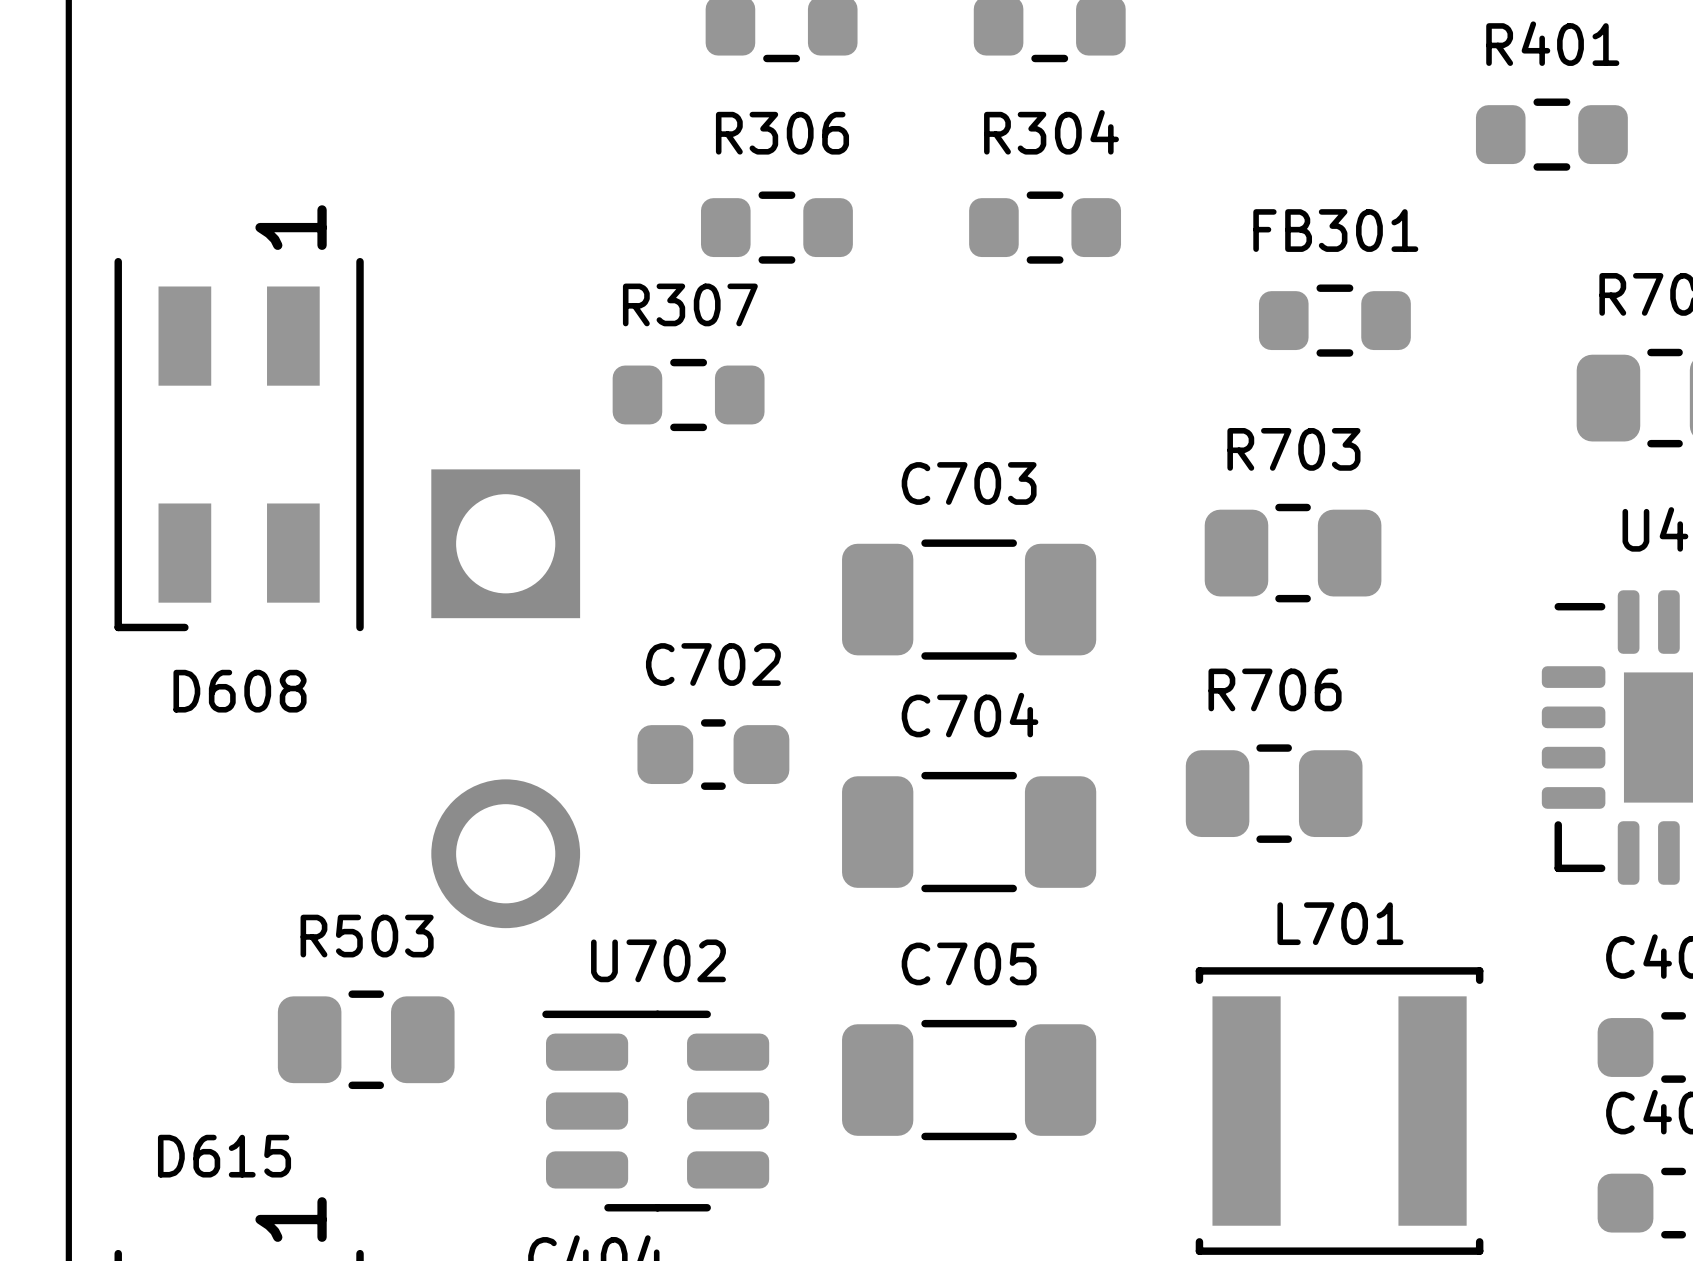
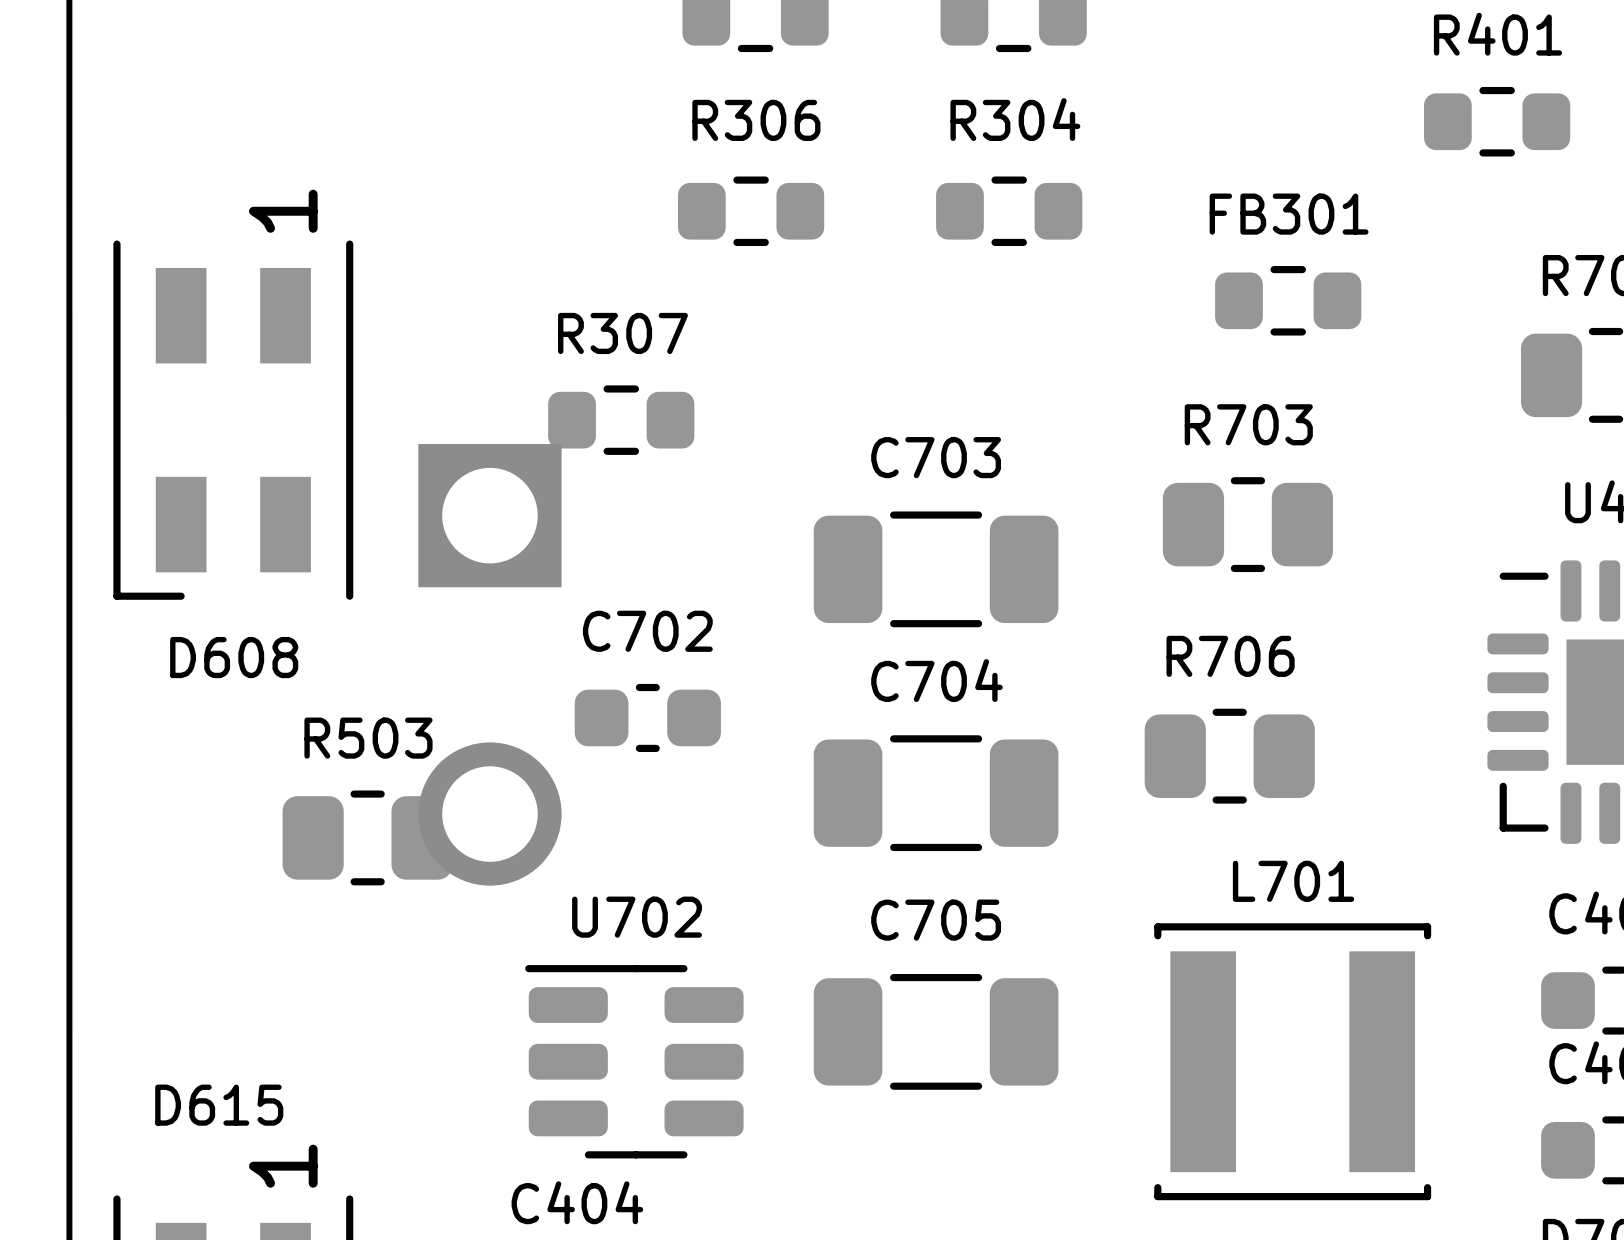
R307 position: (688, 394) -> (621, 420)
C702 position: (713, 754) -> (647, 717)
R503 position: (366, 1039) -> (367, 837)

